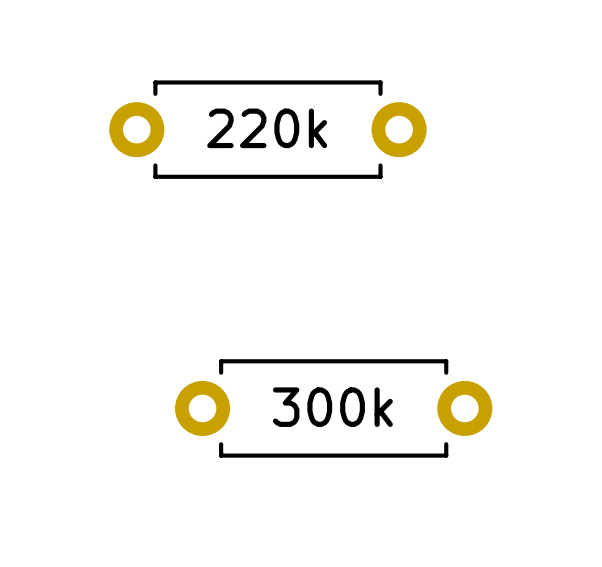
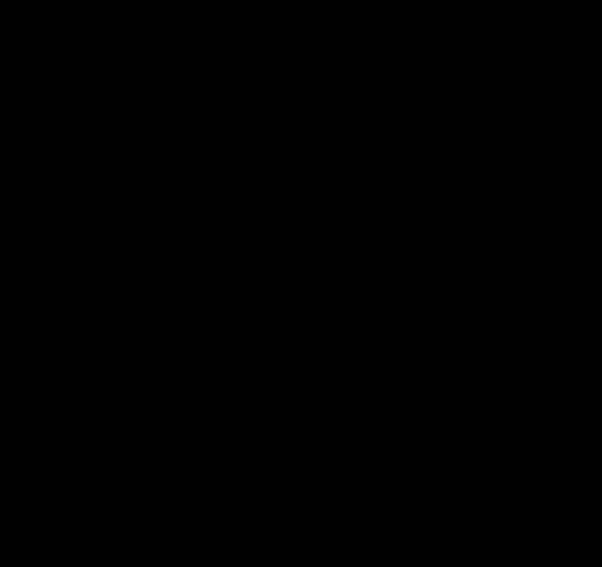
part: 220k (267, 129) -> none
part: 300k (333, 408) -> none

